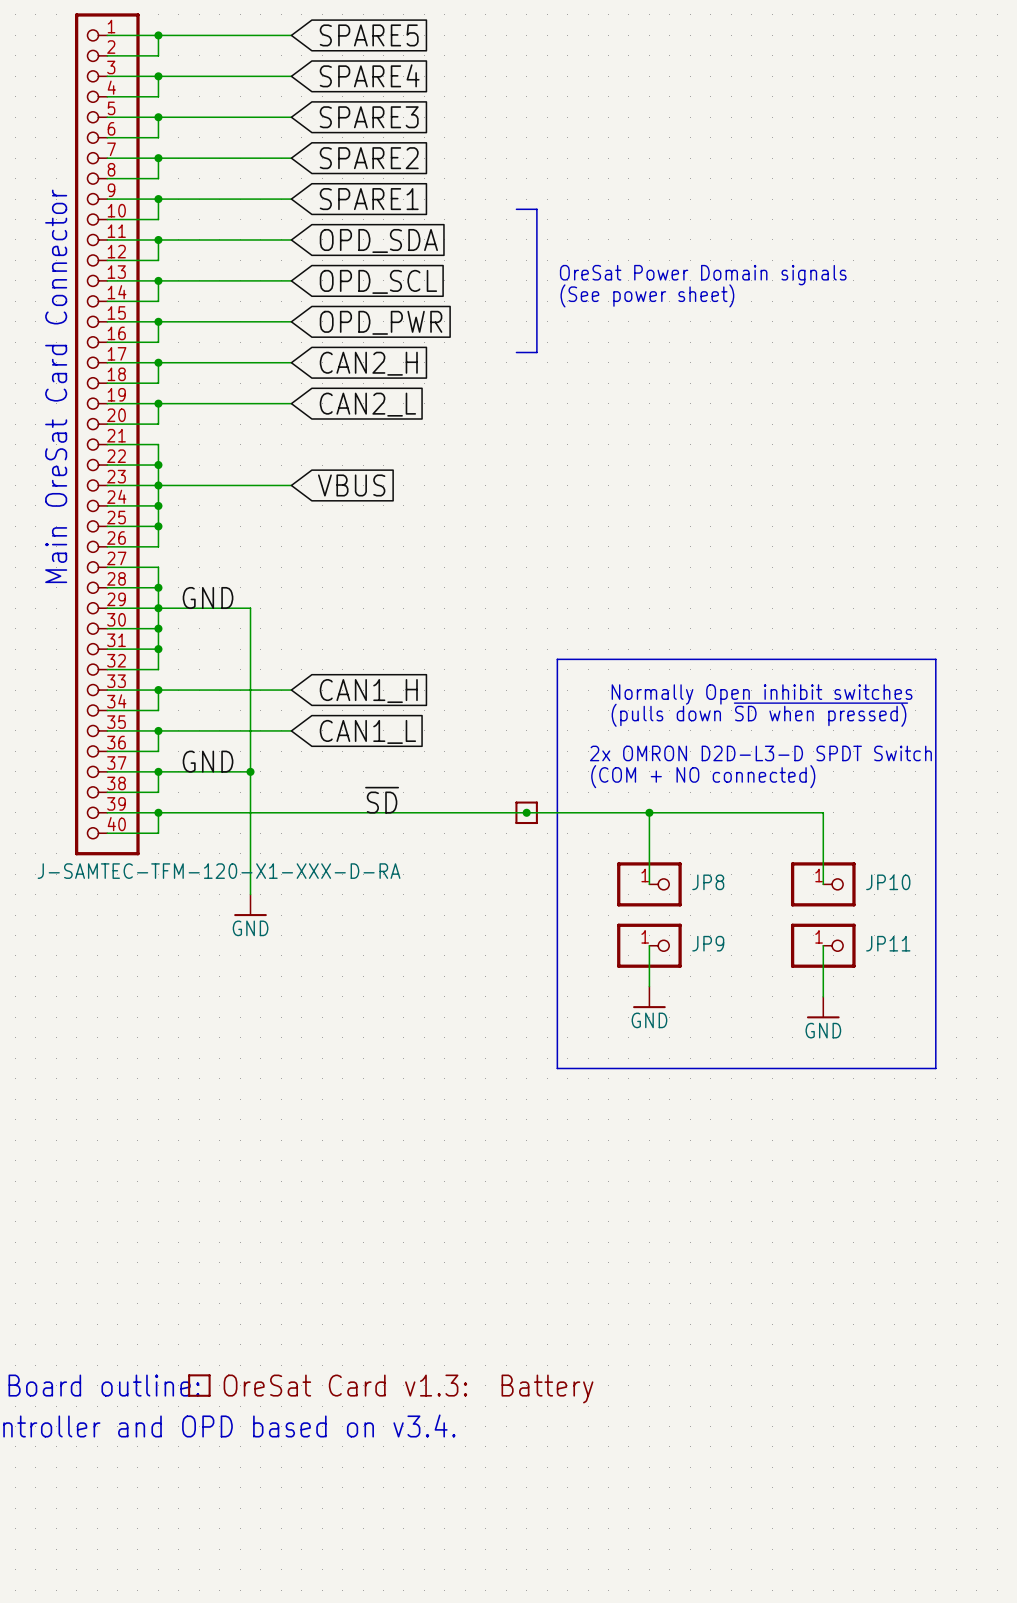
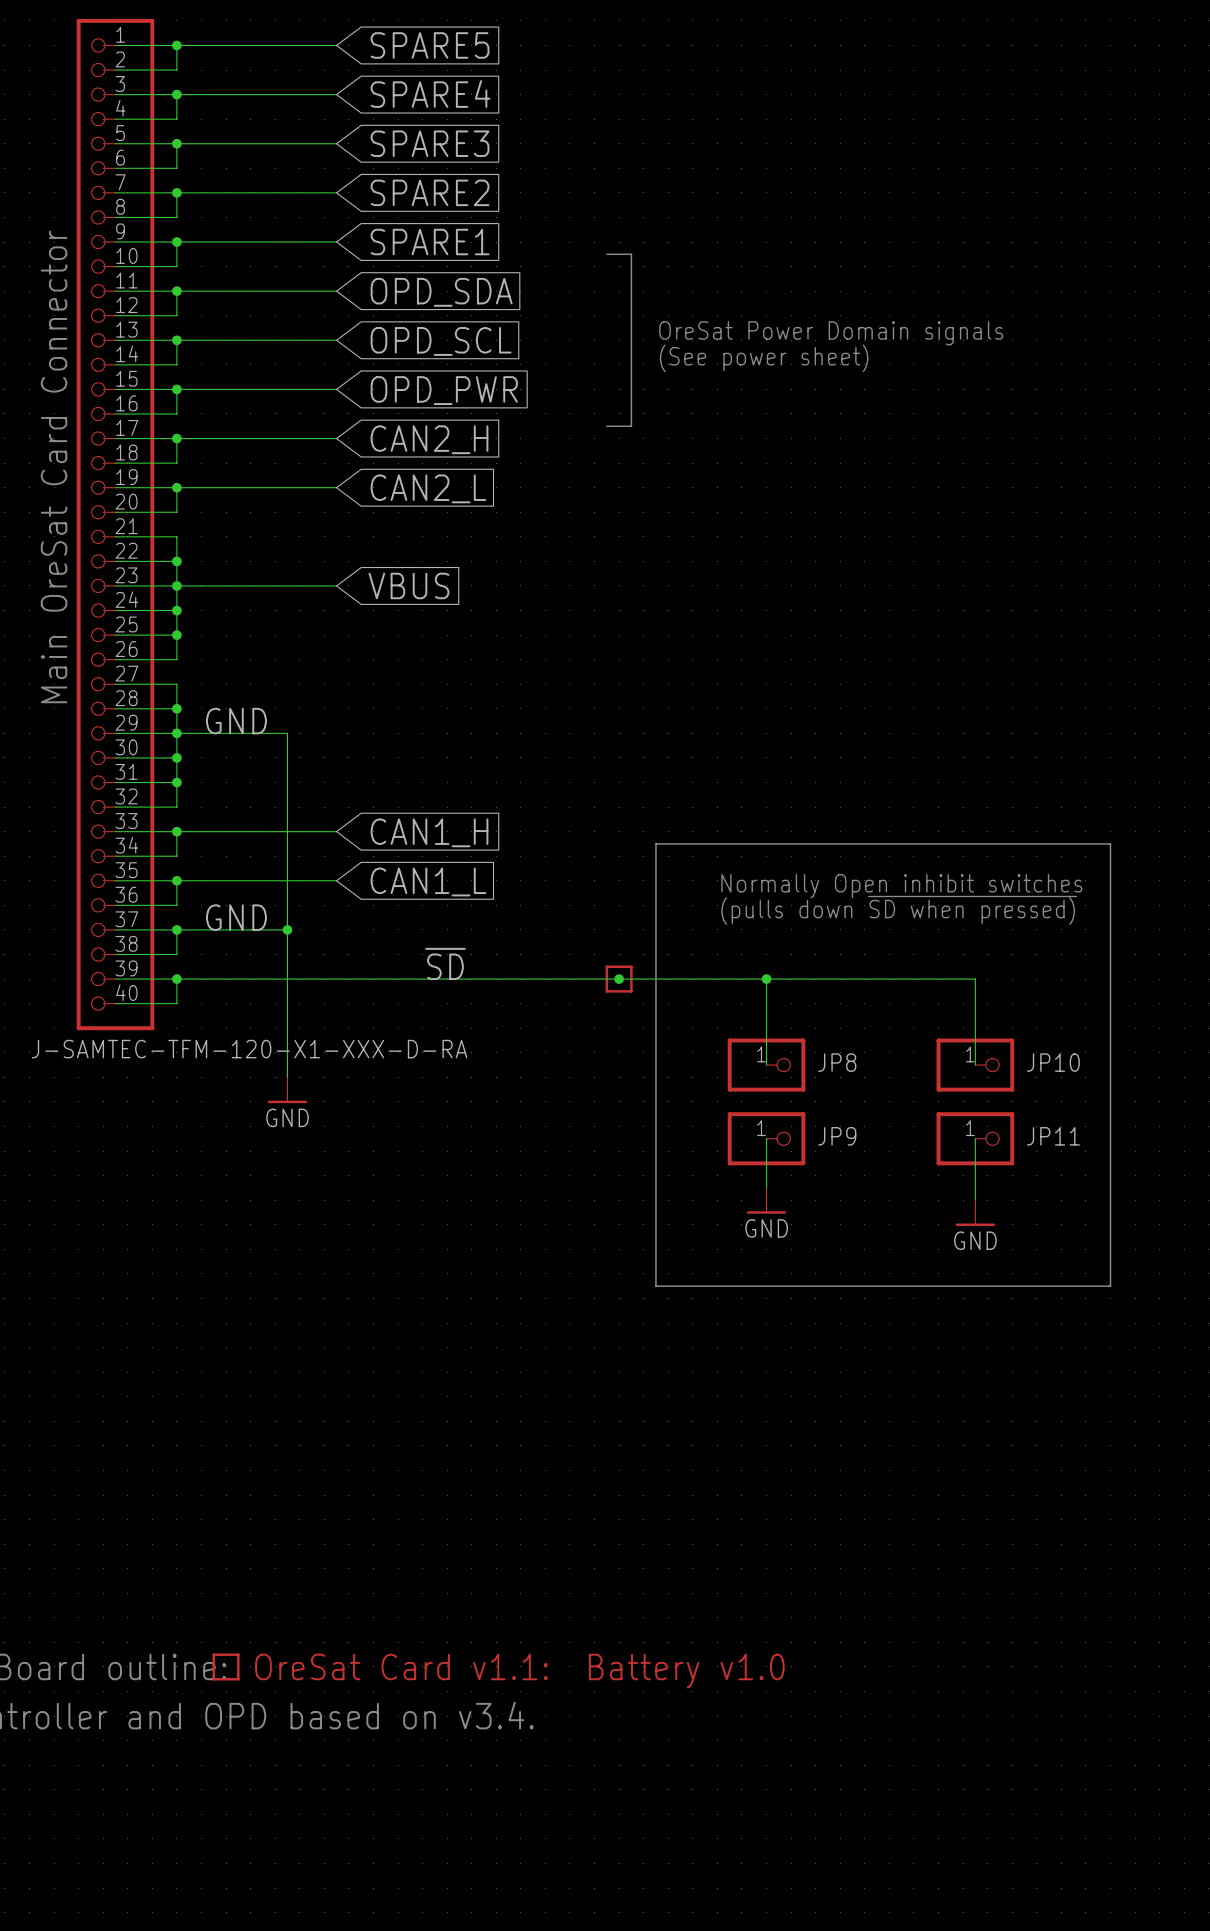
text position: Normally Open inhibit switches (762, 694) -> Normally Open inhibit switches (901, 886)
line: (557, 700) (557, 659) (935, 659) (935, 700) -> (655, 843) (1110, 843)
text position: (pulls down ~{SD when pressed)} (759, 714) -> (pulls down ~{SD when pressed)} (899, 910)
text: 2x OMRON D2D-L3-D SPDT Switch (760, 753) -> none
text: (COM + NO connected) (703, 776) -> none
part text: OreSat Card v1.3: Battery (408, 1388) -> OreSat Card v1.1: Battery v1.0 (519, 1671)

